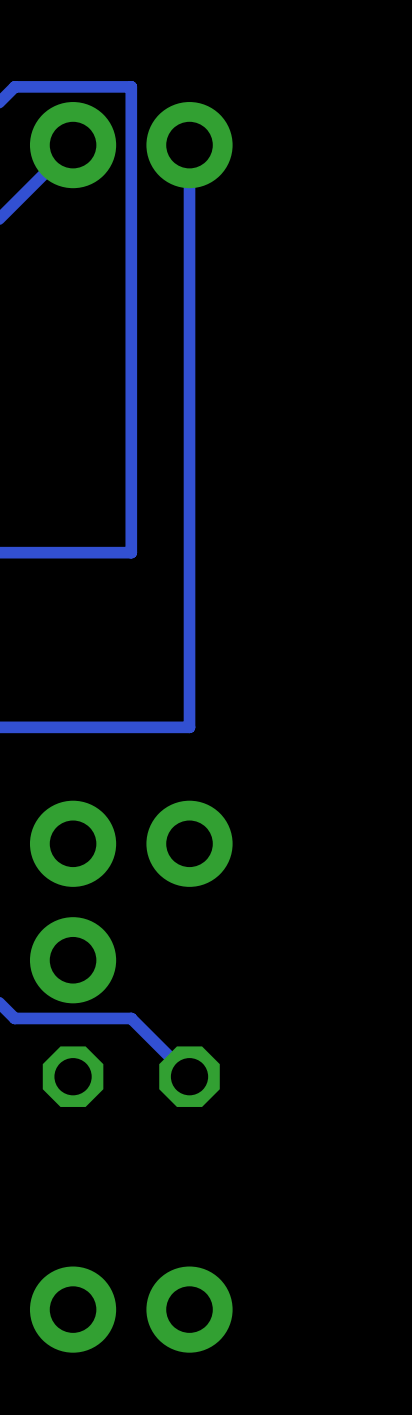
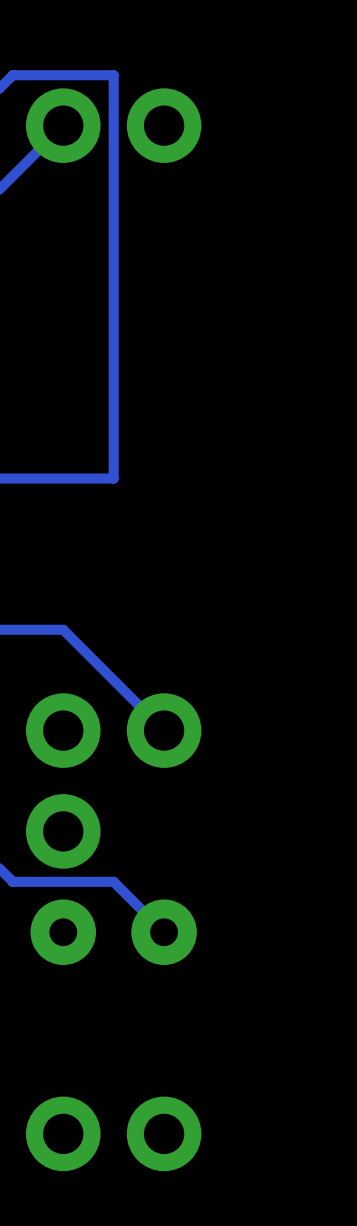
track: (189, 145) (189, 727) (73, 727) -> (164, 730) (63, 629)
part footprint: [42, 1046, 220, 1107] -> [30, 899, 197, 966]

